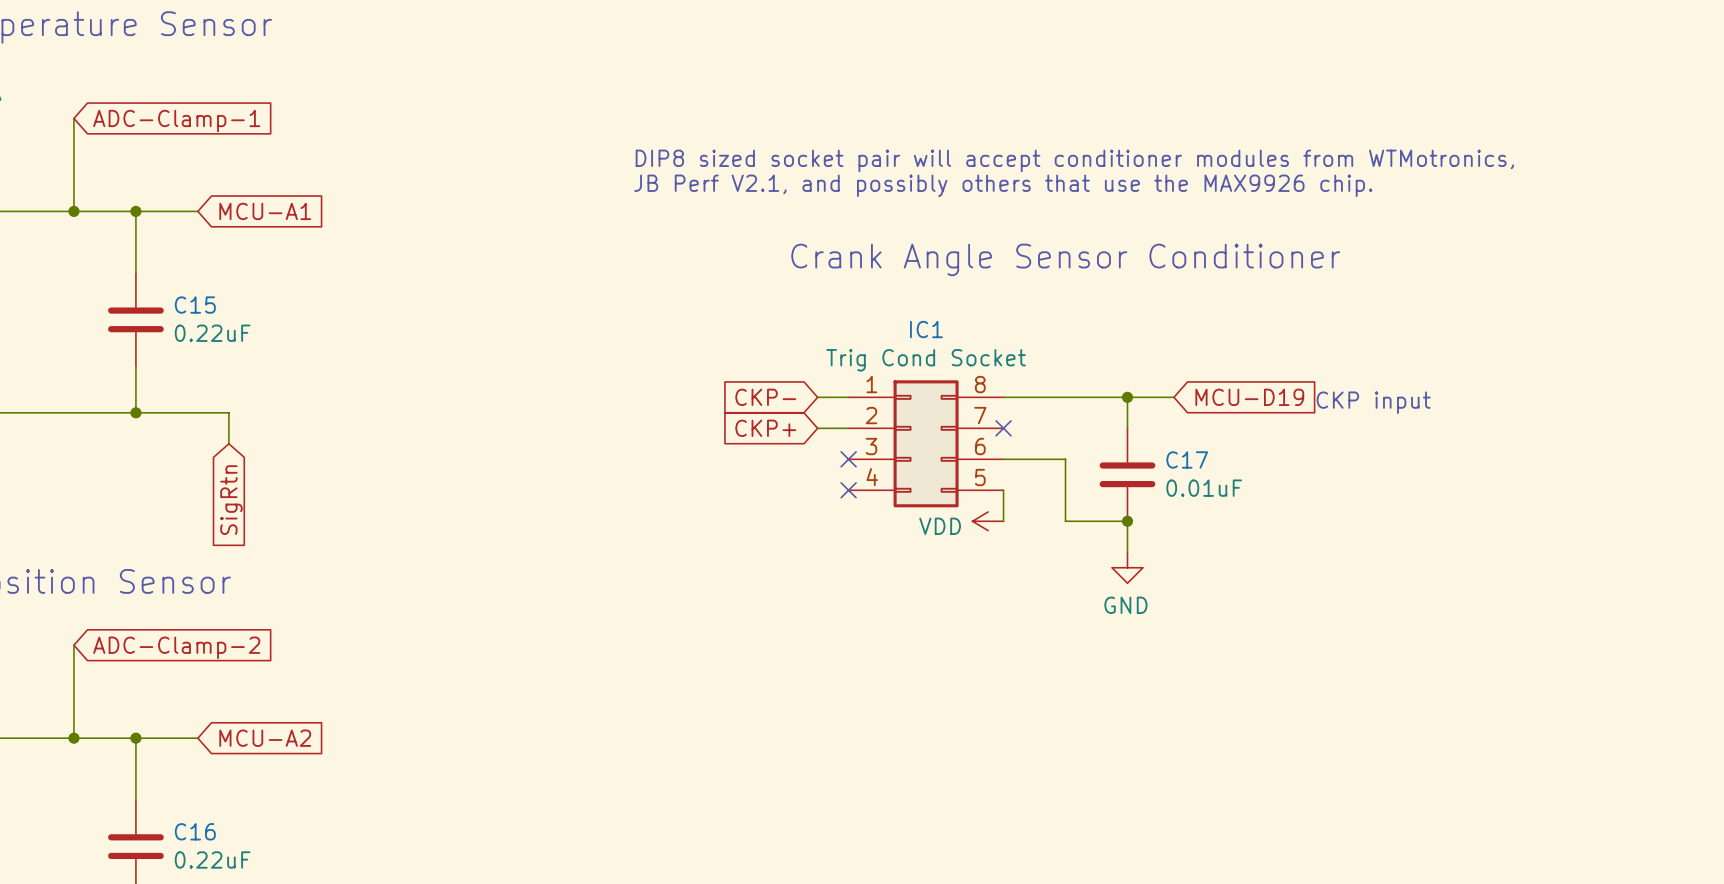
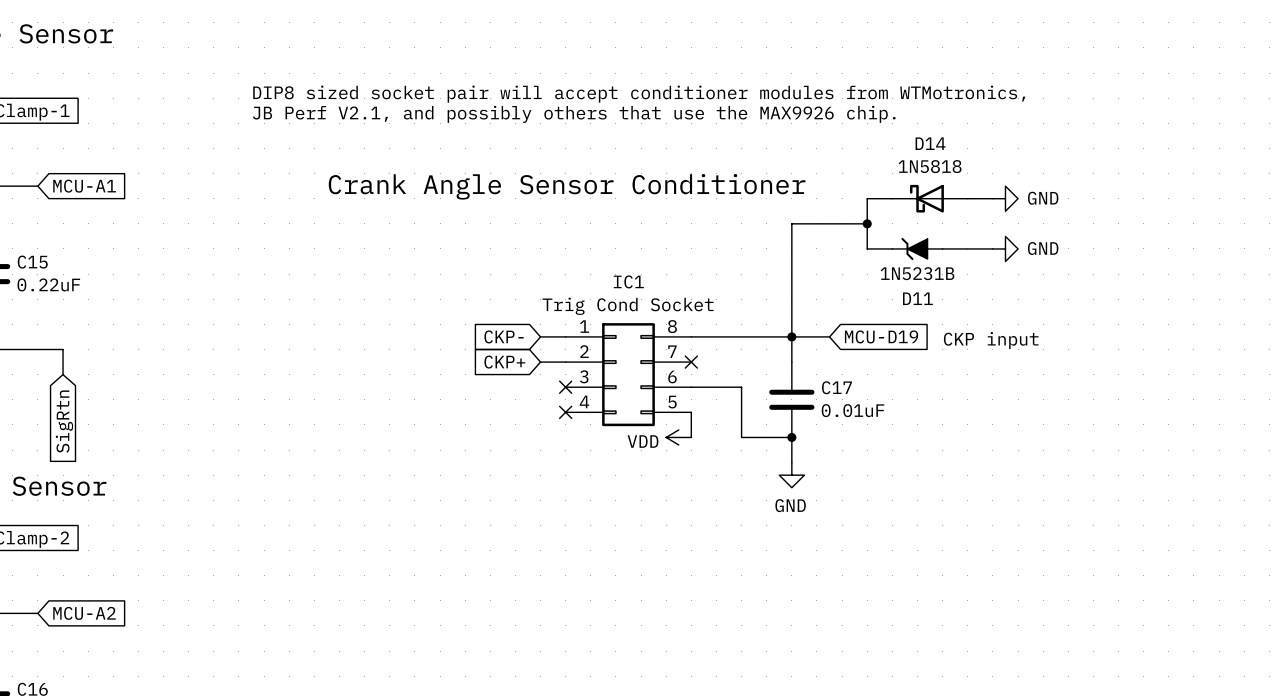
text position: DIP8 sized socket pair will accept conditioner modules from WTMotronics, (1074, 160) -> DIP8 sized socket pair will accept conditioner modules from WTMotronics, (639, 94)
text position: JB Perf V2.1, and possibly others that use the MAX9926 chip. (1003, 185) -> JB Perf V2.1, and possibly others that use the MAX9926 chip. (574, 114)
wire: none -> (892, 198) (867, 198) (867, 248) (892, 248)
D14: none -> 1N5818 (930, 198)
wire: none -> (967, 198) (992, 198)
power symbol: none -> GND (1005, 198)
wire: none -> (867, 223) (791, 223) (791, 336)
junction: none -> (867, 223)
text position: Crank Angle Sensor Conditioner (1065, 259) -> Crank Angle Sensor Conditioner (567, 186)
D11: none -> 1N5231B (917, 248)
wire: none -> (942, 248) (992, 248)
power symbol: none -> GND (1005, 248)

